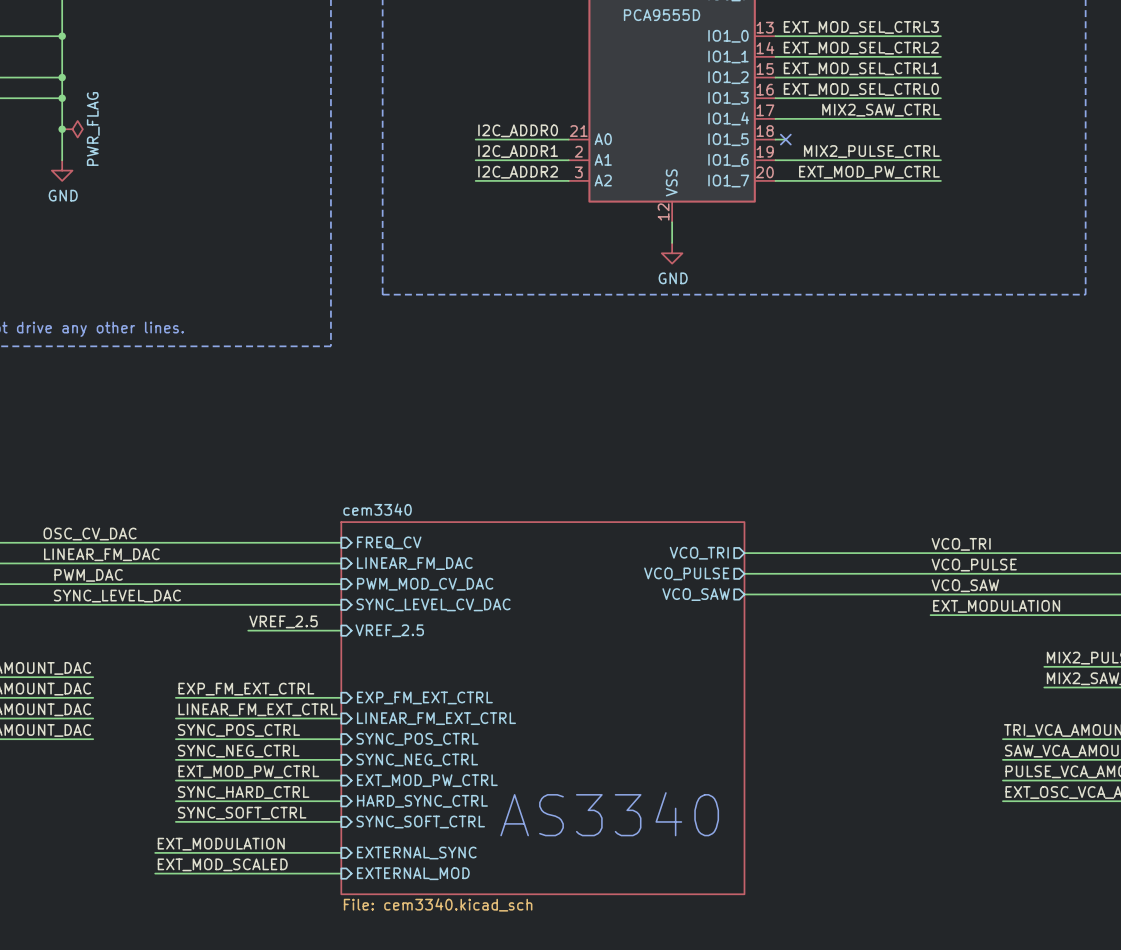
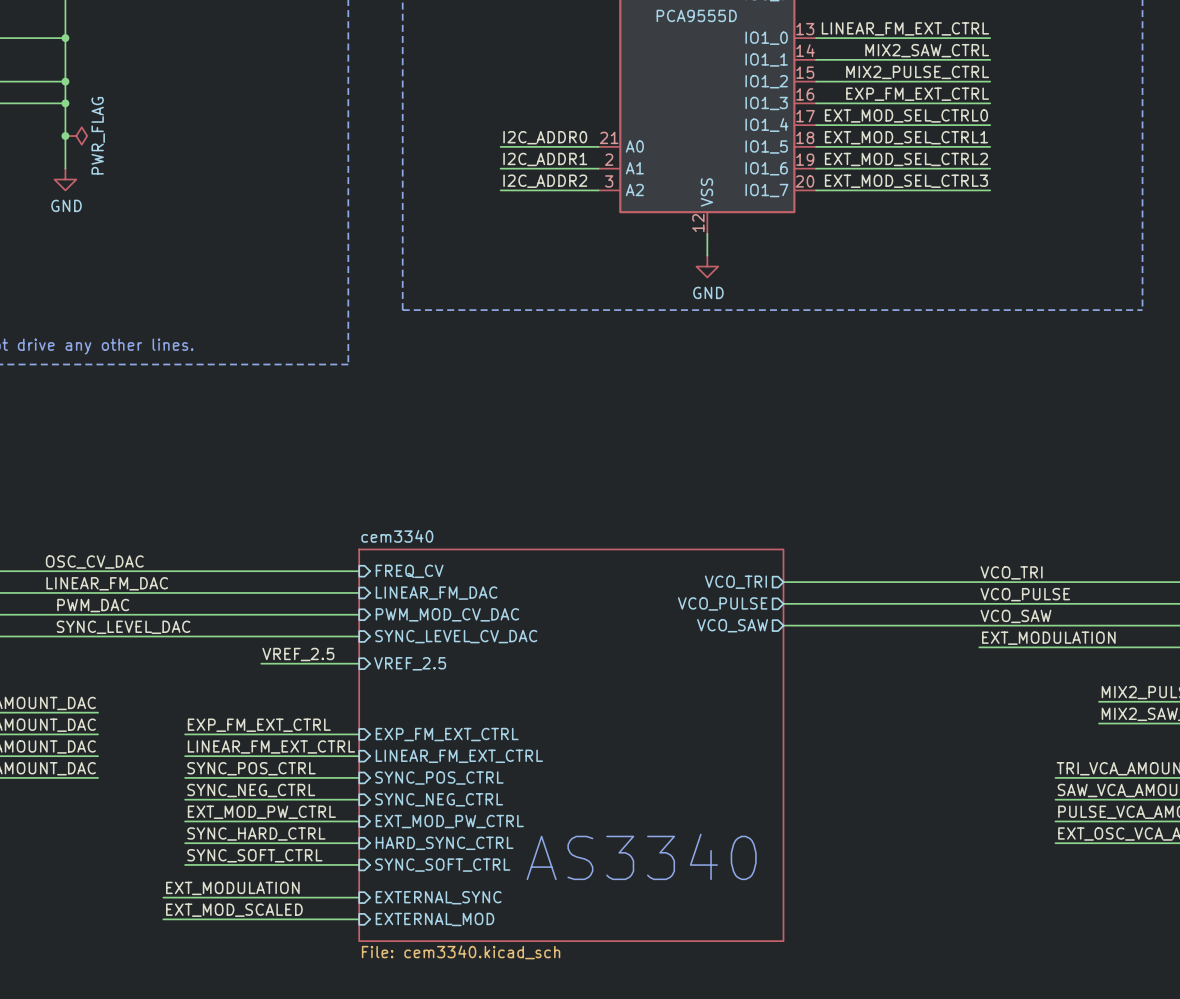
label: EXT_MOD_SEL_CTRL3 (861, 27) -> LINEAR_FM_EXT_CTRL (905, 28)
label: EXT_MOD_SEL_CTRL2 (861, 48) -> MIX2_SAW_CTRL (927, 50)
label: EXT_MOD_SEL_CTRL1 (861, 68) -> MIX2_PULSE_CTRL (917, 72)
label: EXT_MOD_SEL_CTRL0 (861, 89) -> EXP_FM_EXT_CTRL (917, 94)
label: MIX2_SAW_CTRL (881, 110) -> EXT_MOD_SEL_CTRL0 (906, 115)
label: none -> EXT_MOD_SEL_CTRL1 (906, 137)
wire: none -> (827, 146) (990, 146)
no-connect mark: (785, 139) -> none
label: MIX2_PULSE_CTRL (871, 151) -> EXT_MOD_SEL_CTRL2 (906, 159)
label: EXT_MOD_PW_CTRL (869, 172) -> EXT_MOD_SEL_CTRL3 (906, 181)

